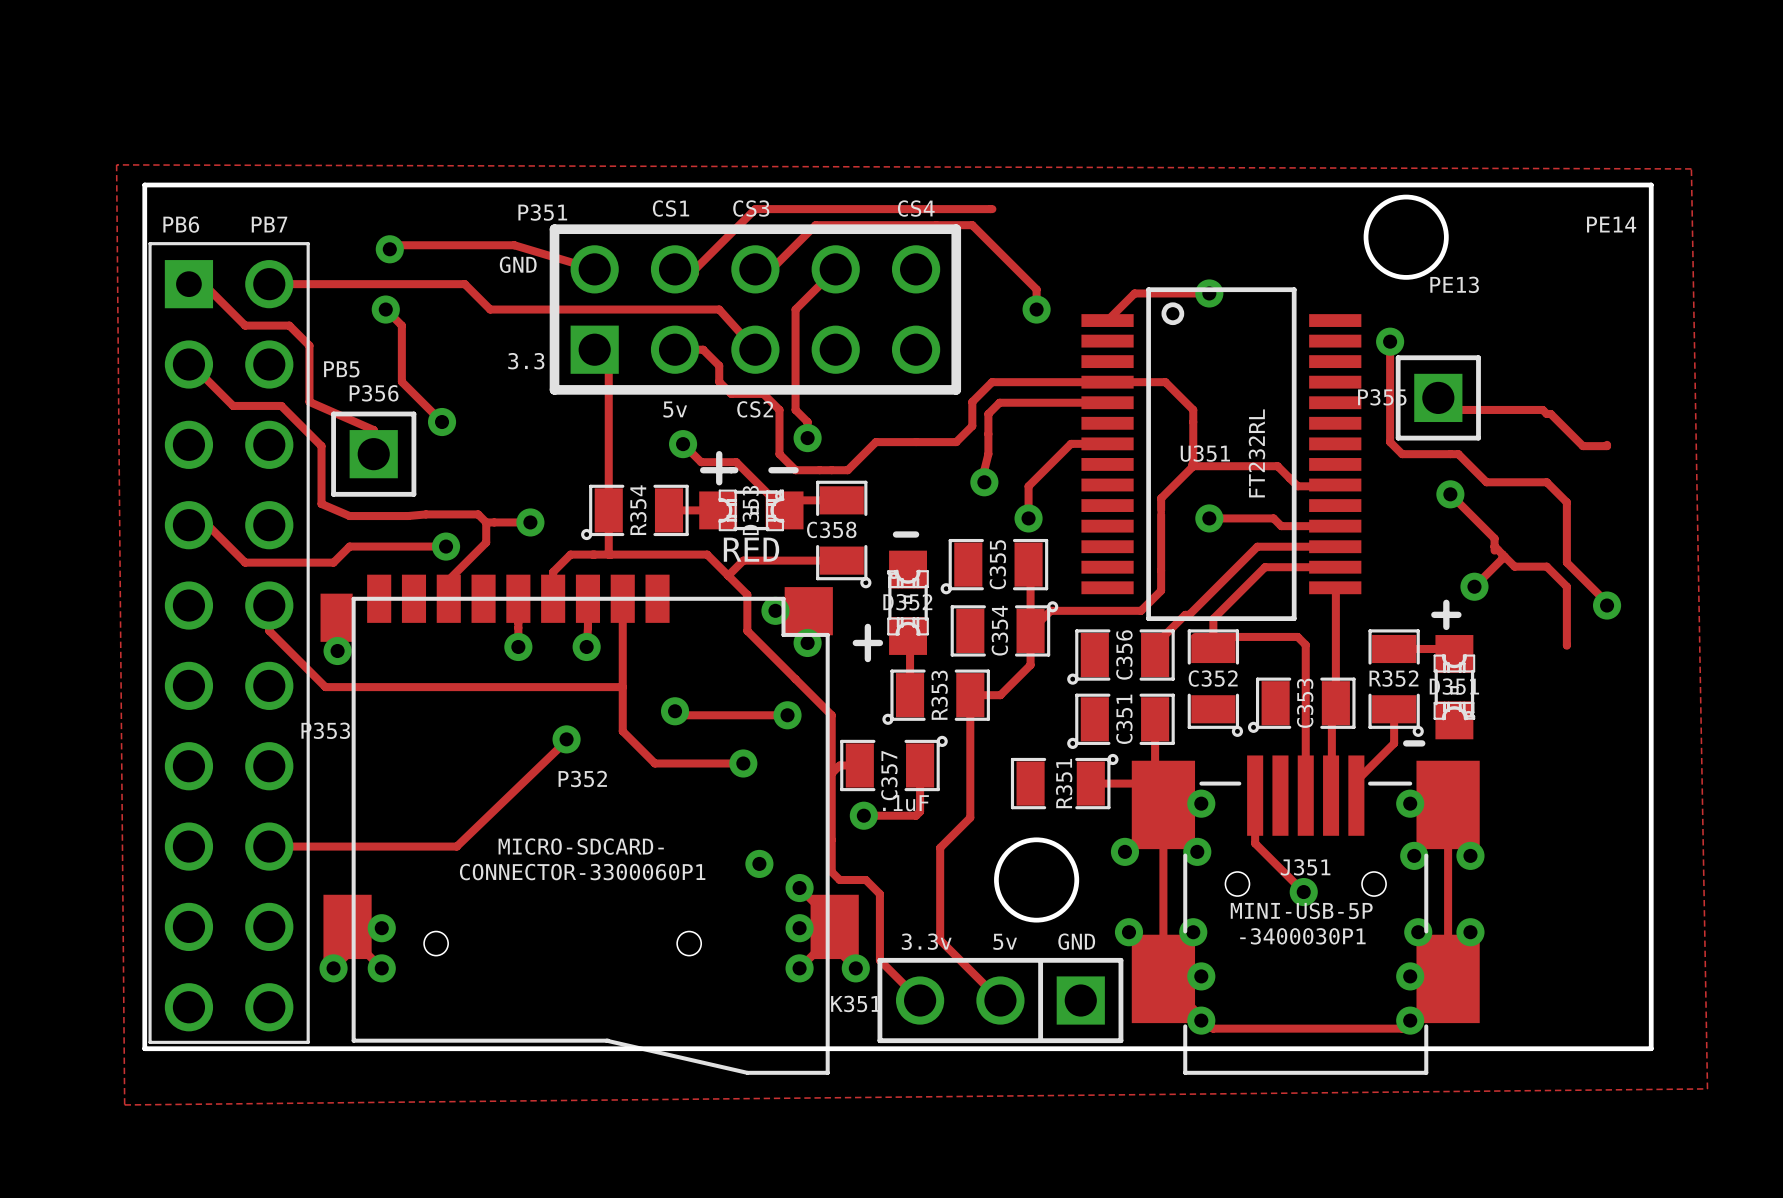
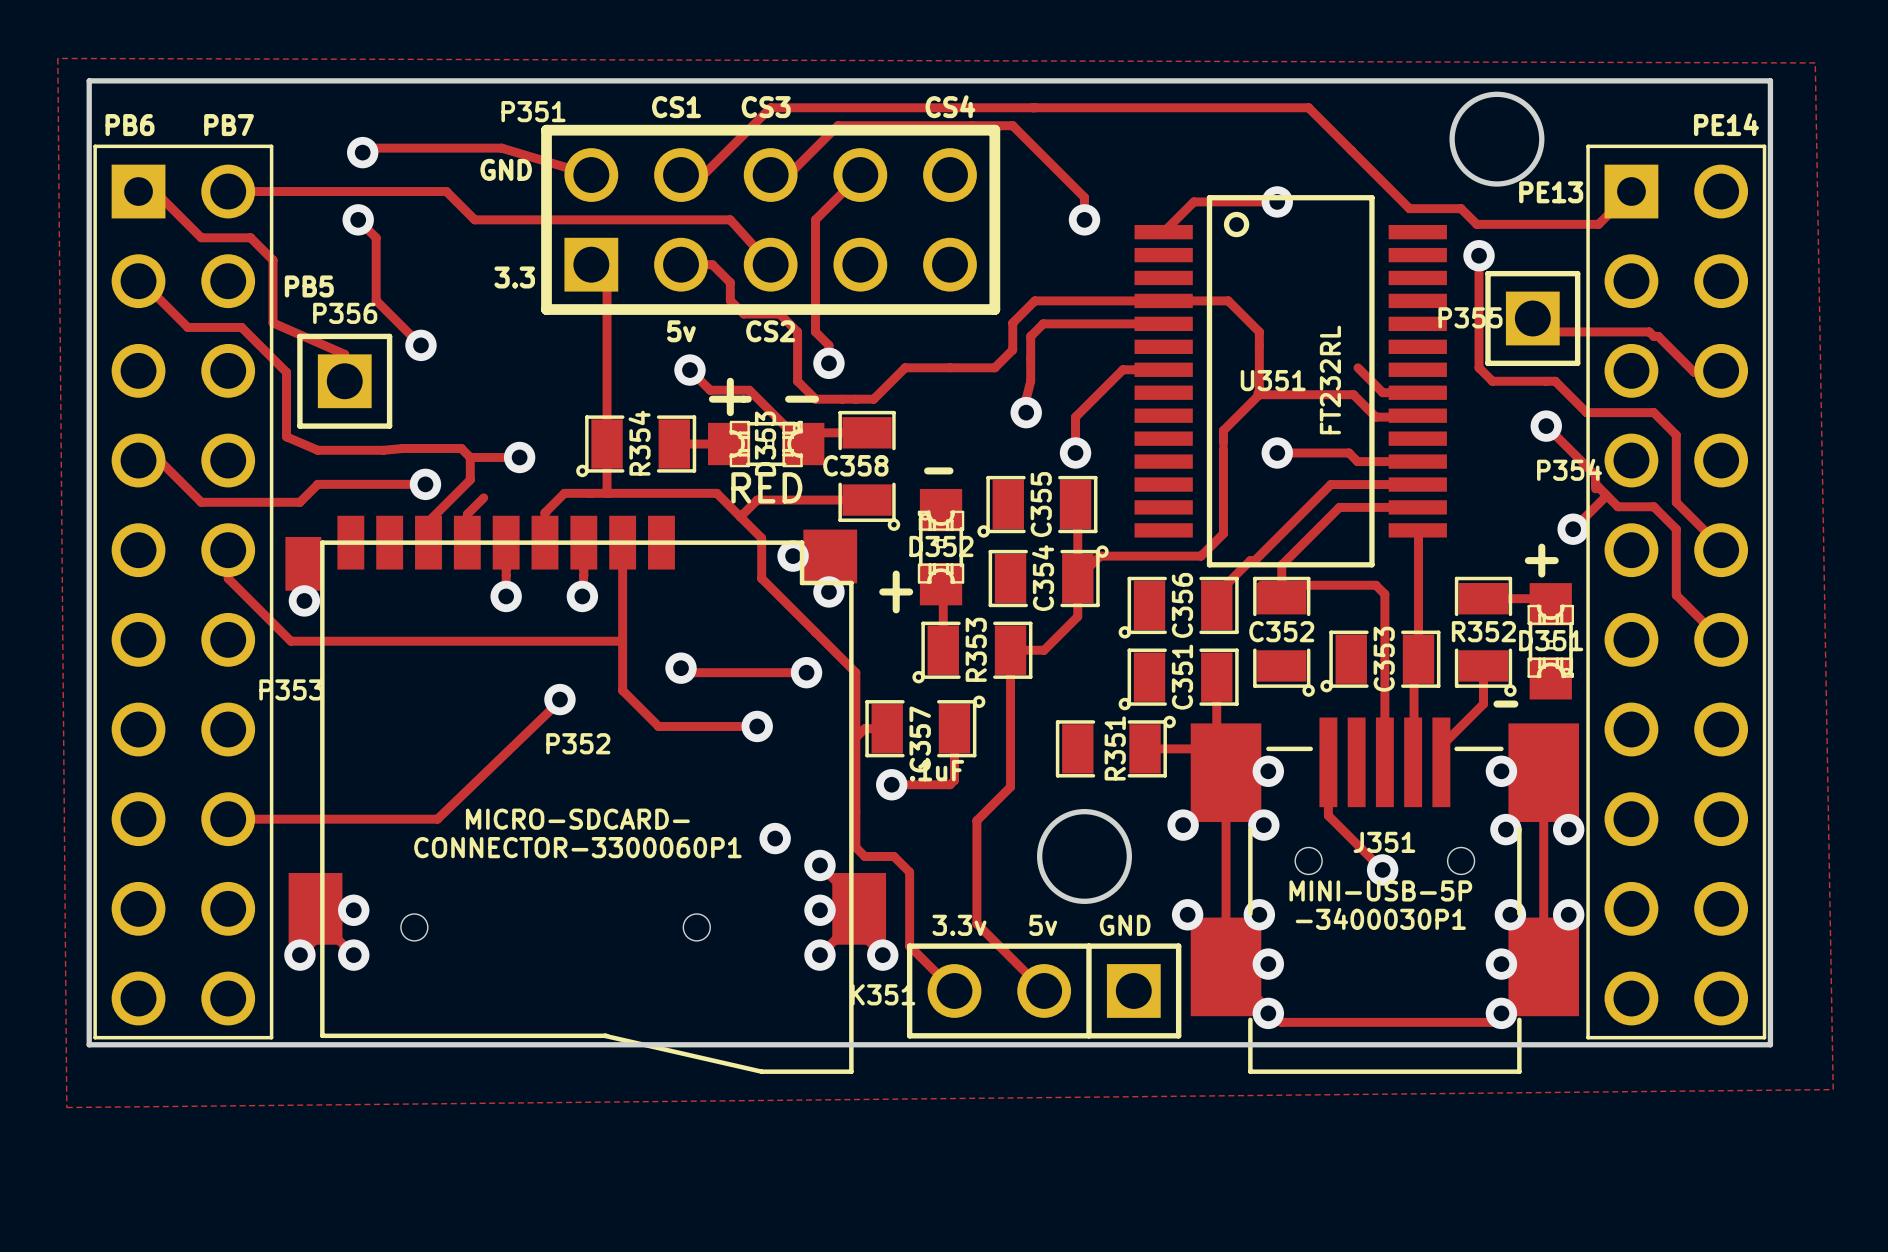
track: none -> (1035, 107) (1308, 107) (1409, 208) (1461, 208) (1476, 224) (1598, 224) (1631, 191)
track: none -> (1357, 367) (1382, 392) (1417, 392)
track: none -> (483, 497) (467, 514) (467, 542)
via: (1607, 605) -> none
P354: none -> (1676, 592)
track: none -> (1676, 595) (1721, 639)

